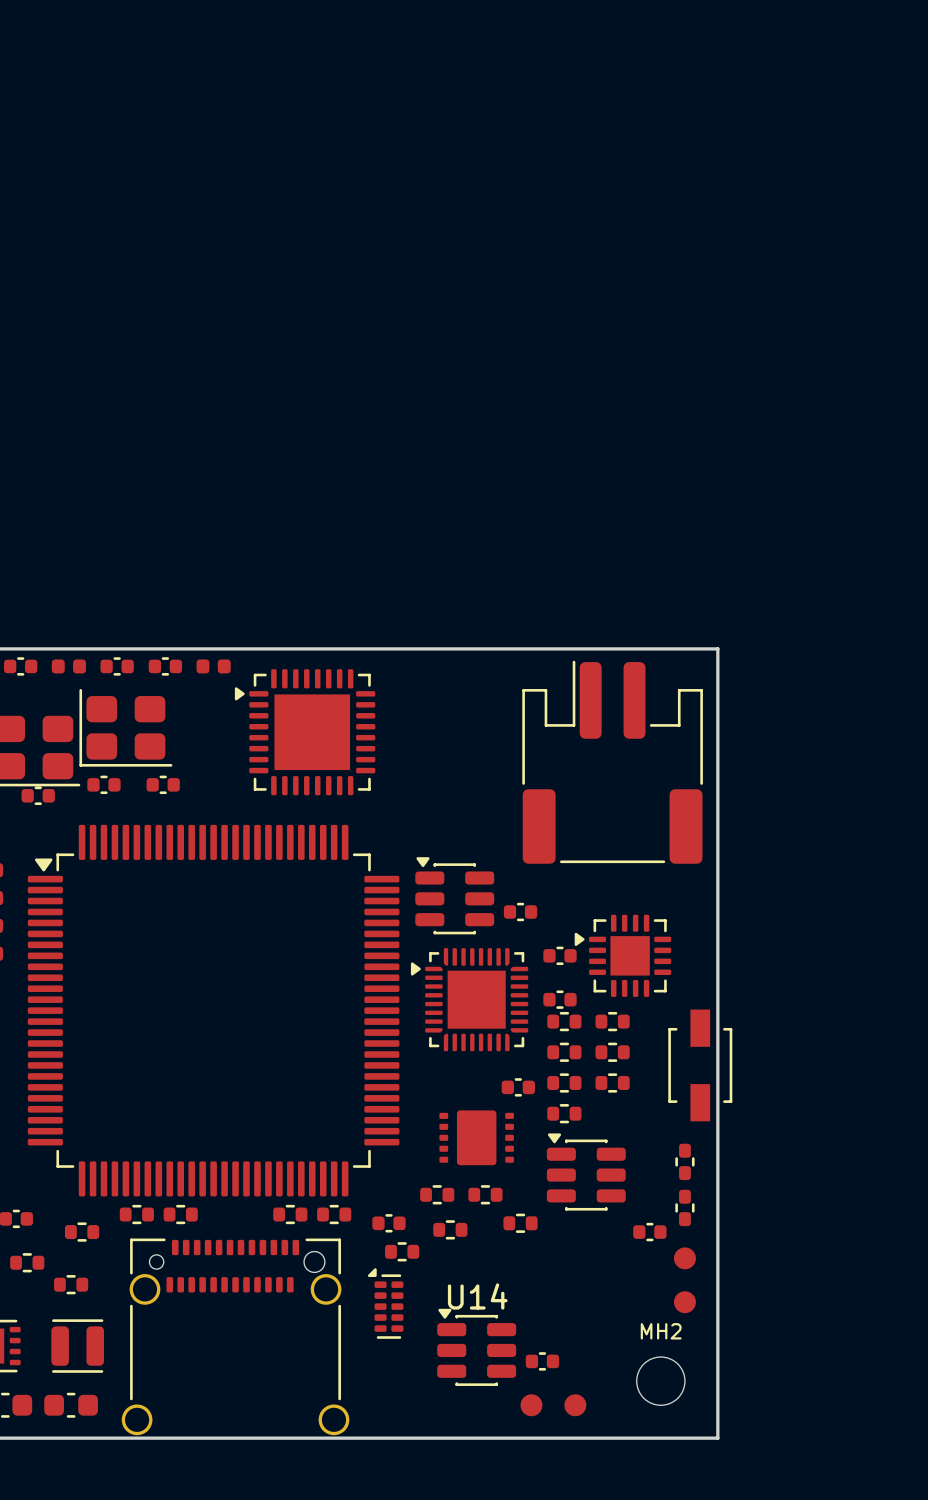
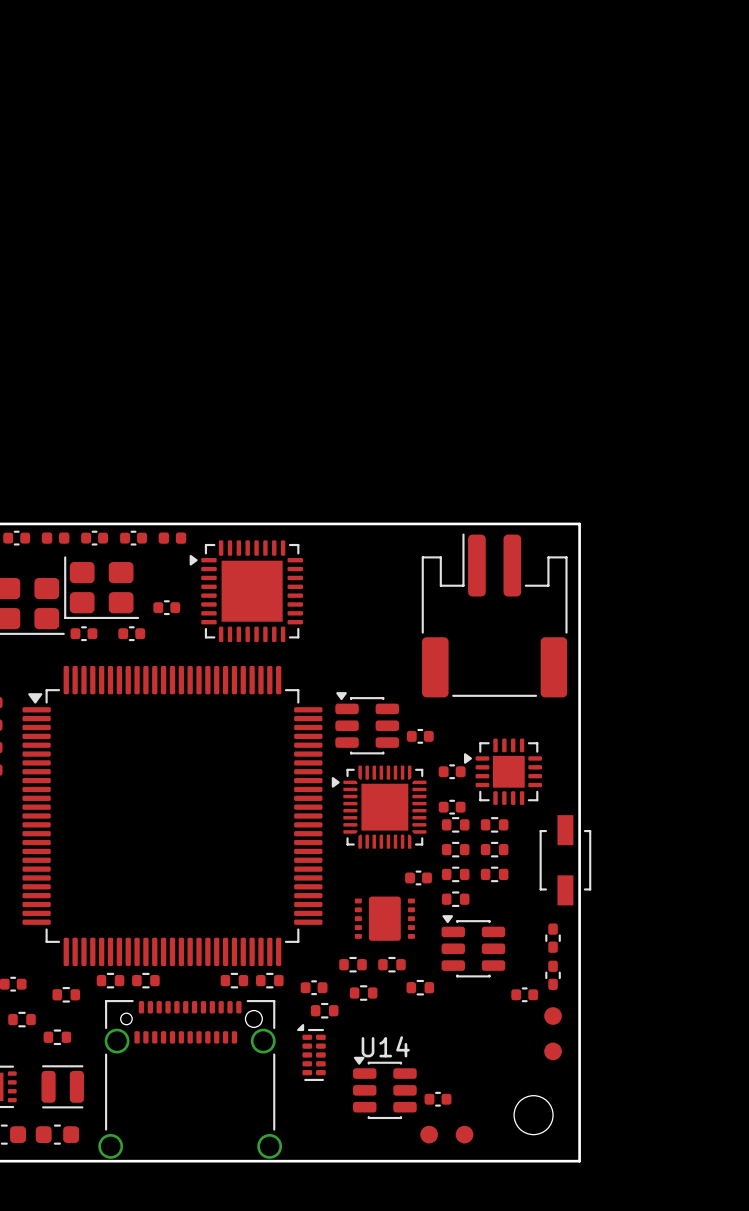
part position: (38, 795) -> (166, 607)
MH2 name: MH2 (661, 1331) -> none

